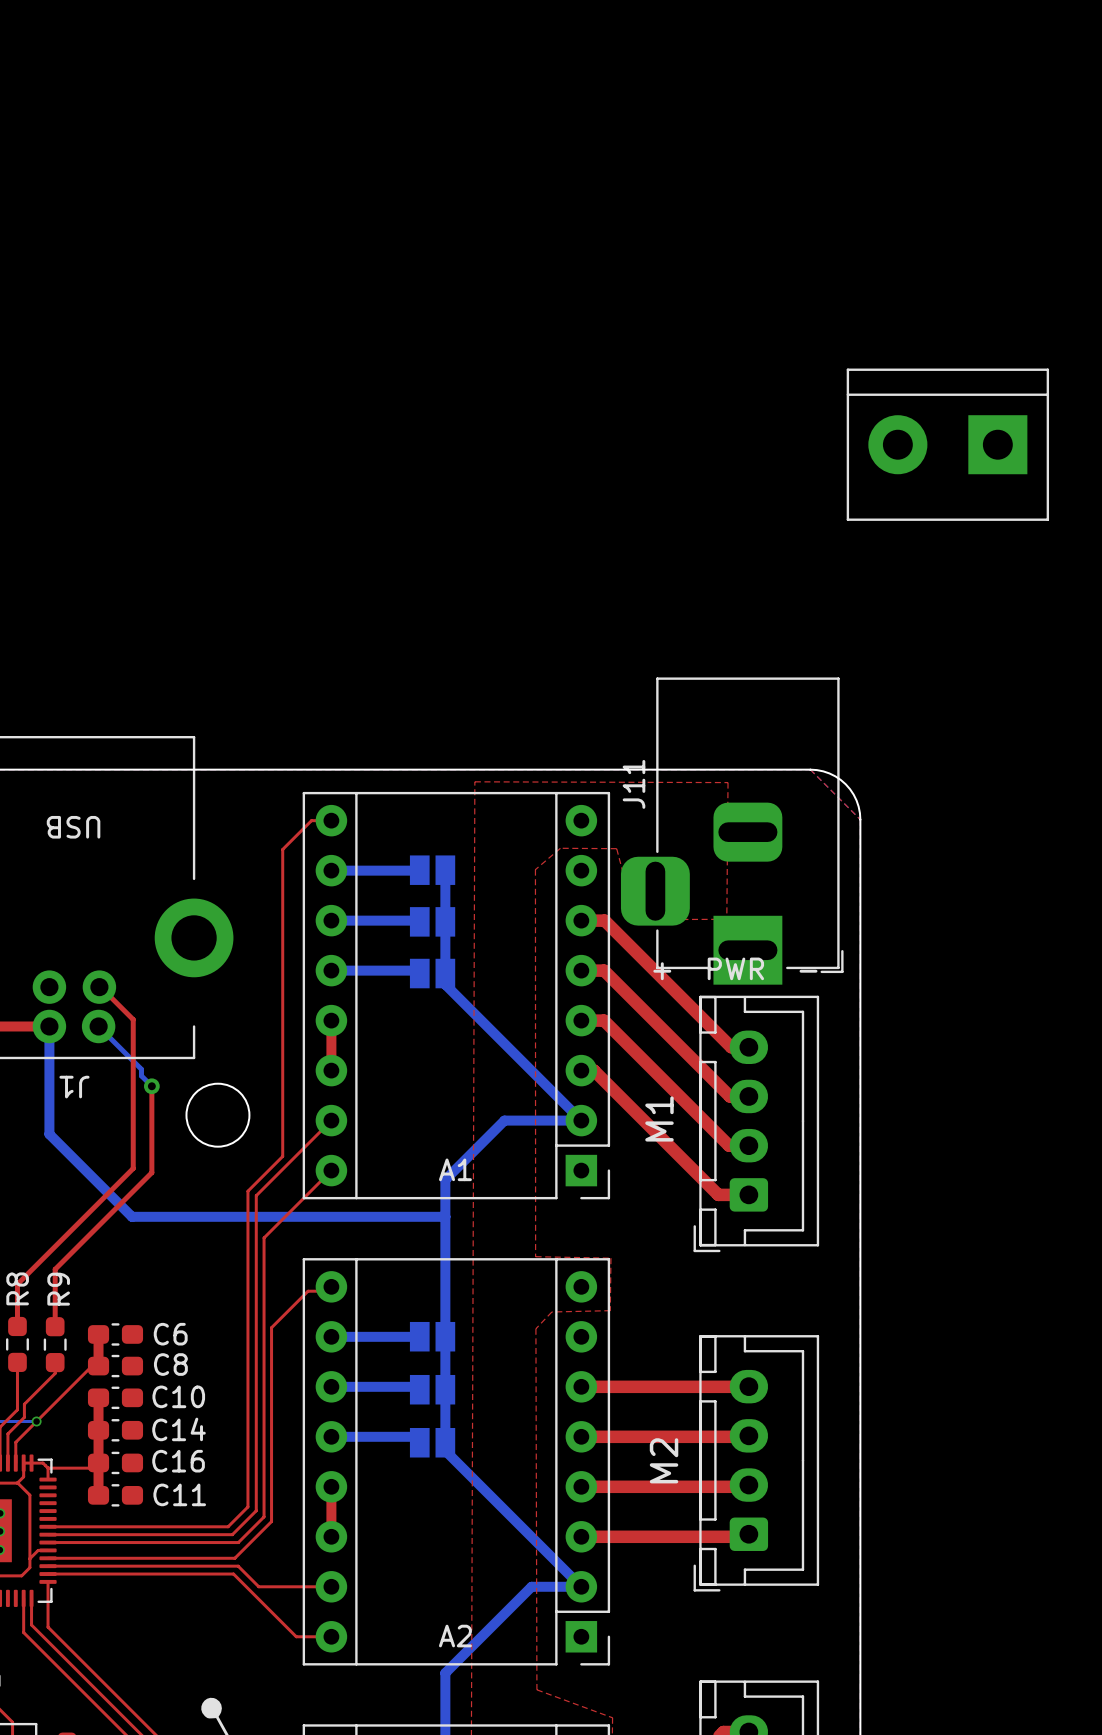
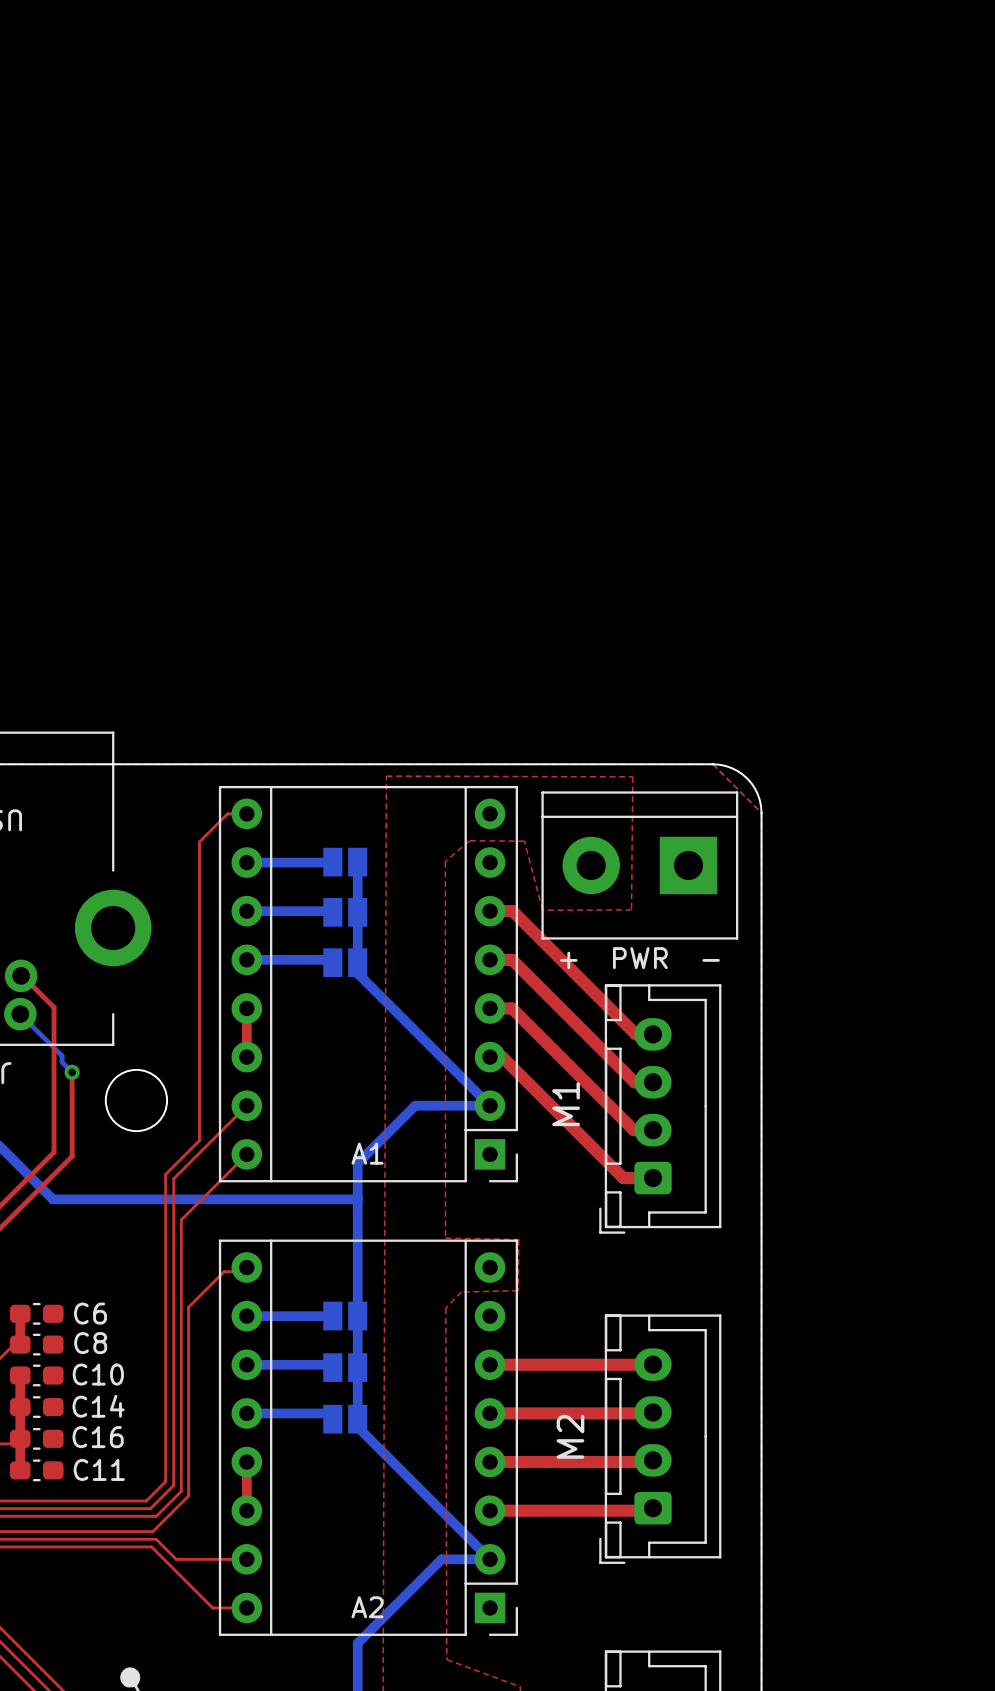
part position: (947, 444) -> (639, 865)
J11: (732, 831) -> none

